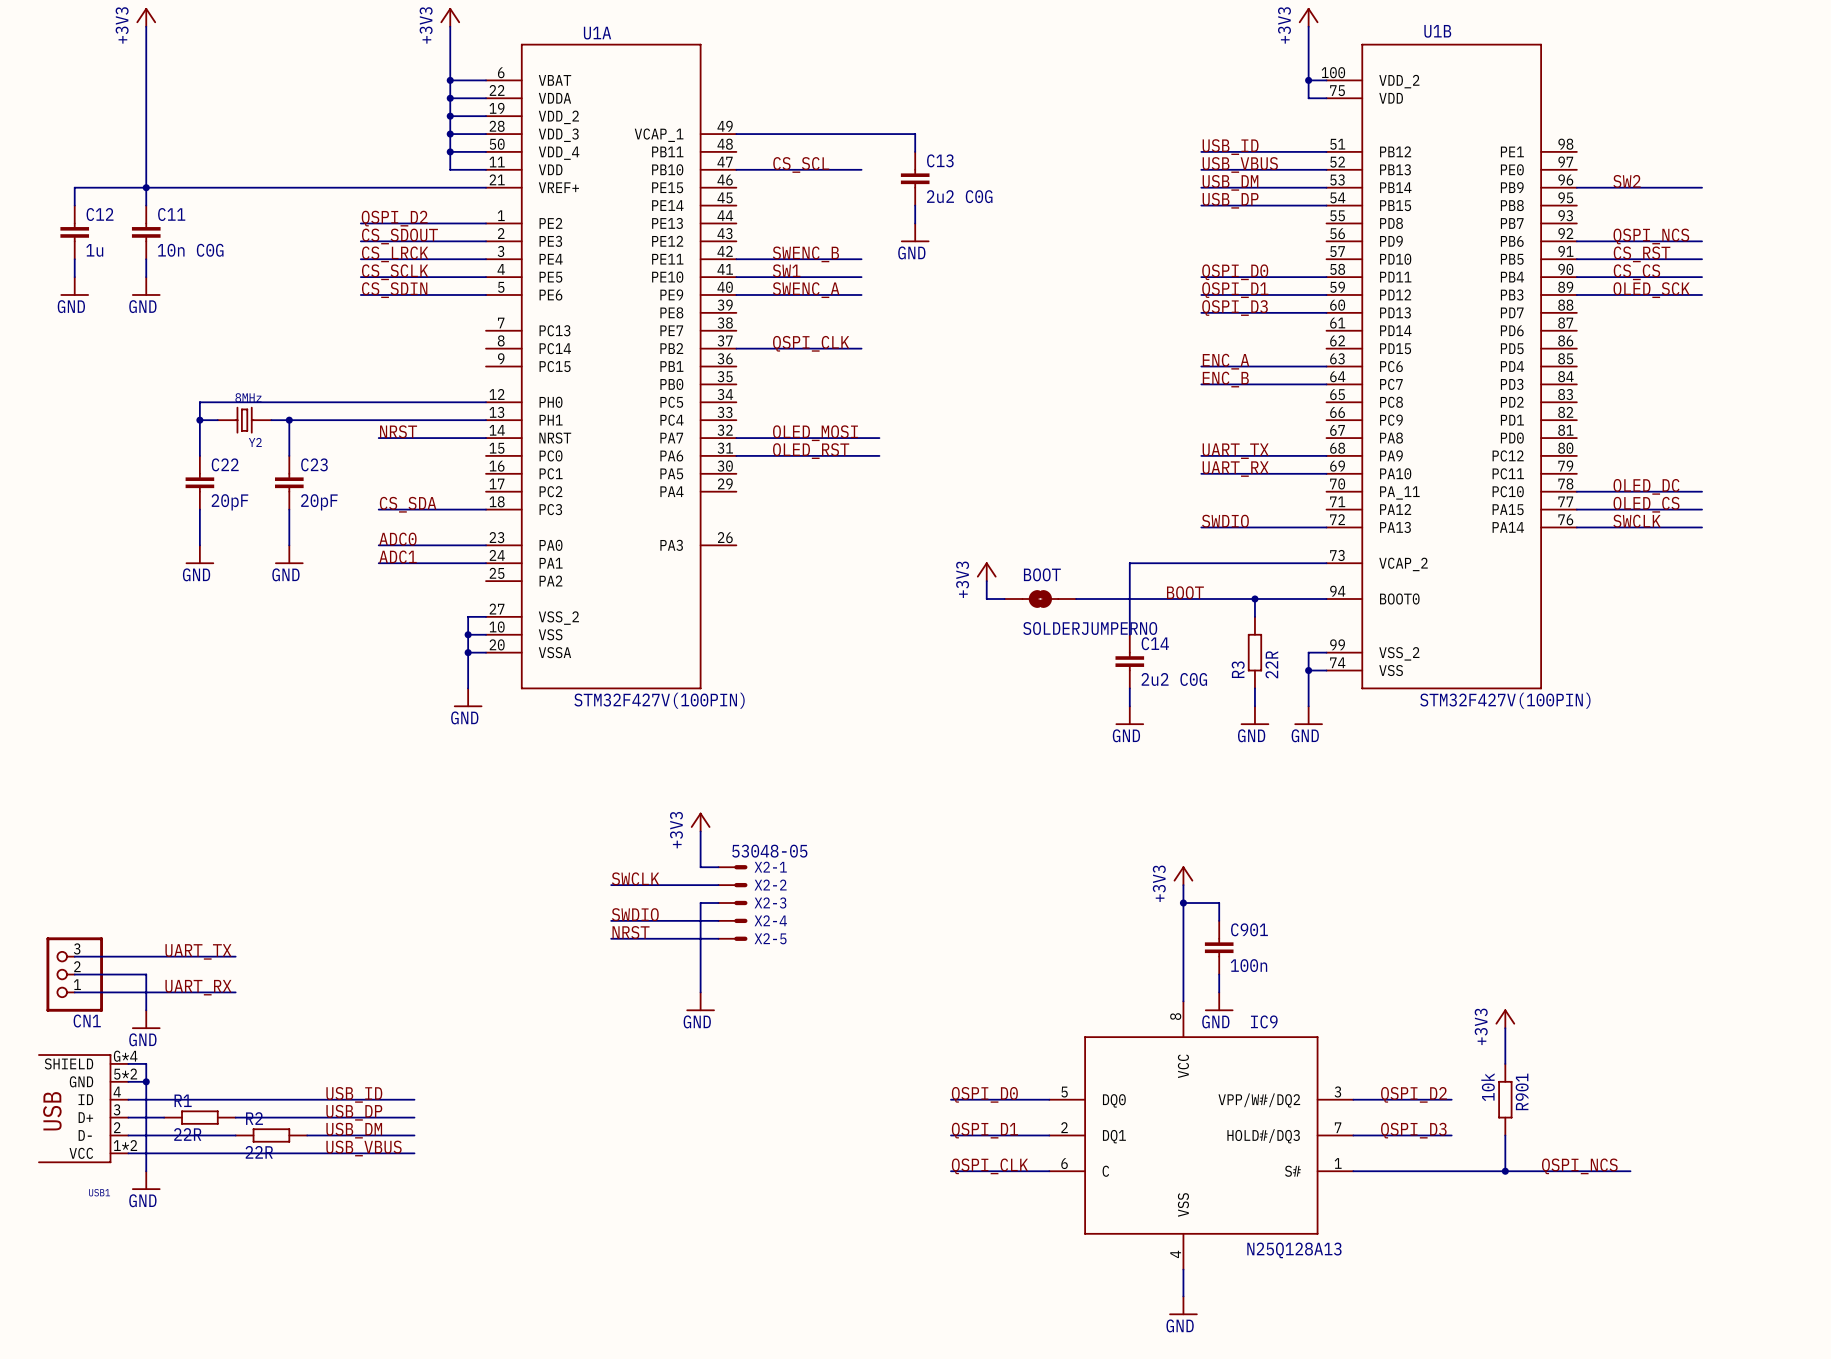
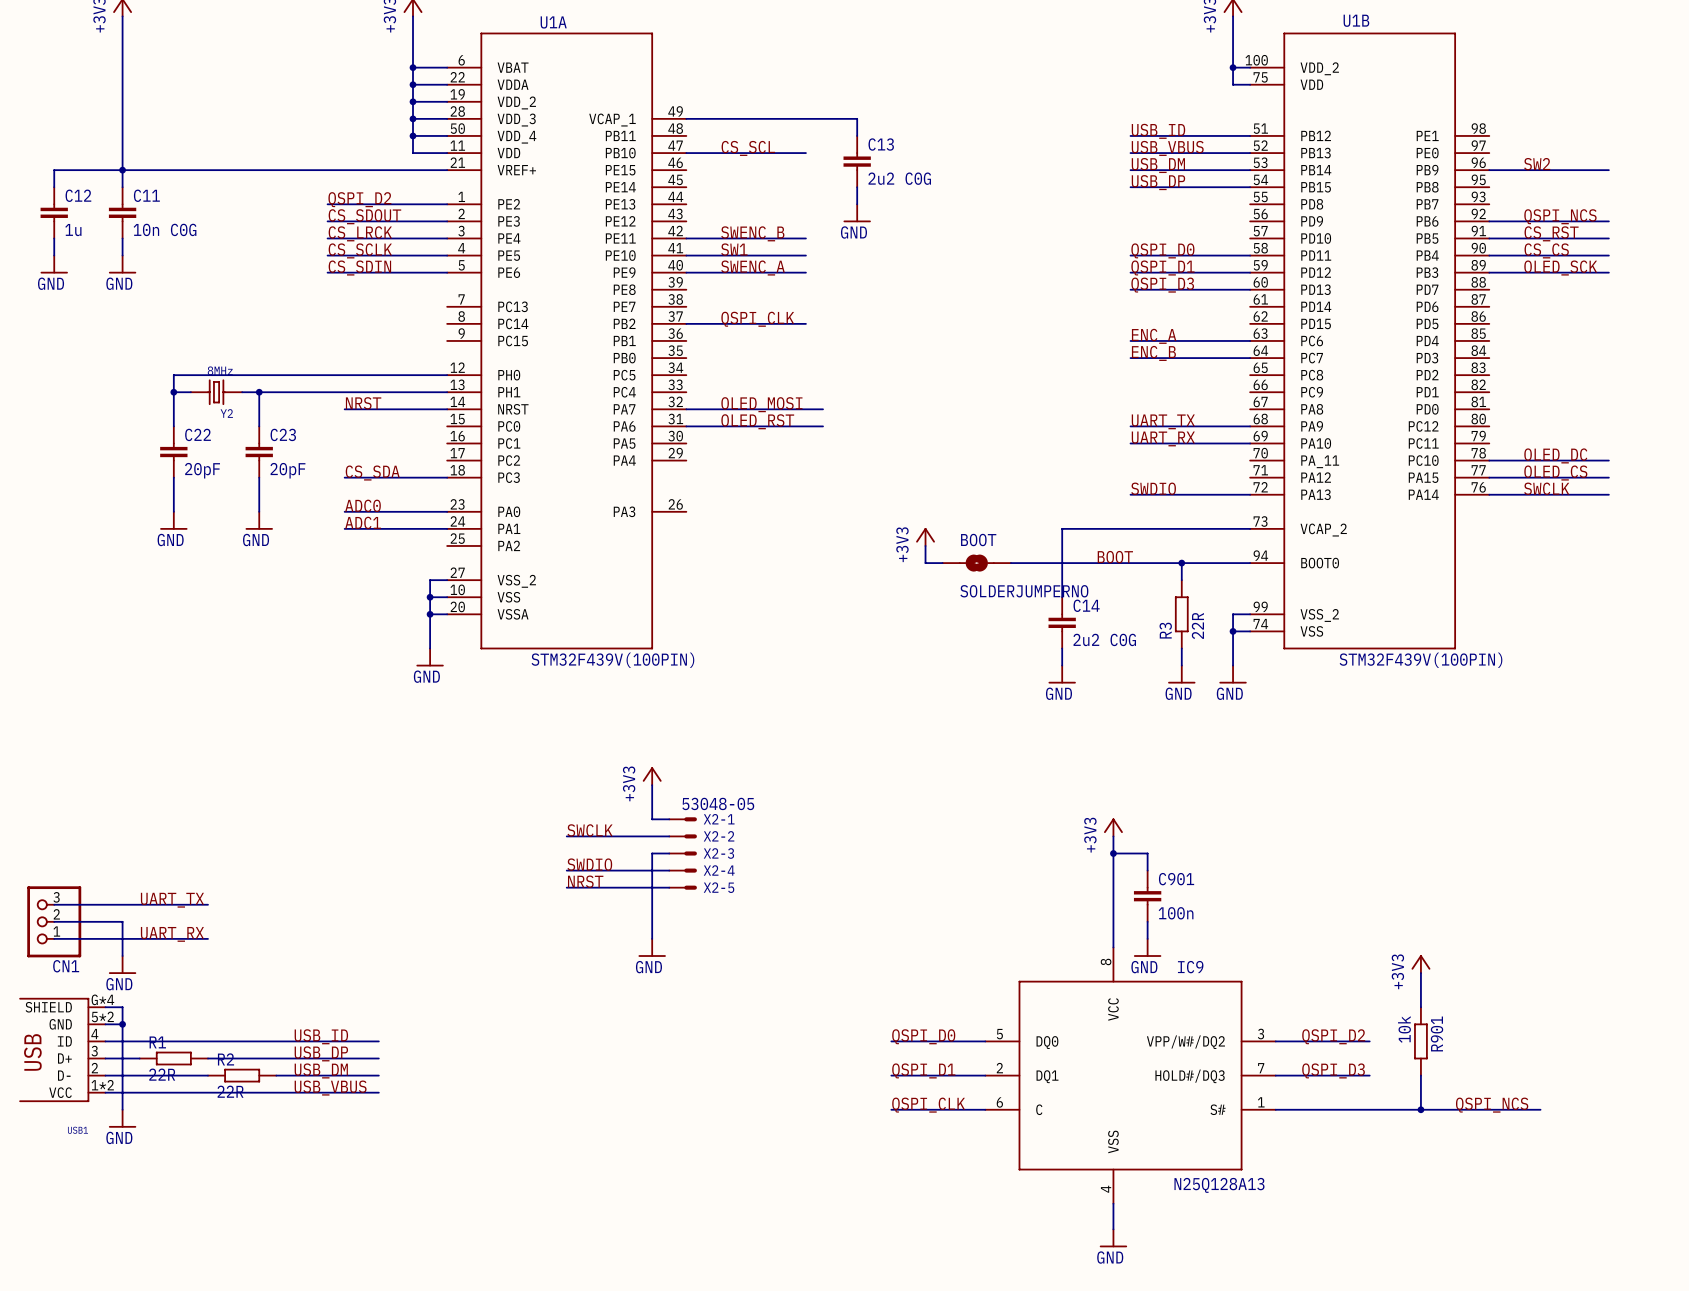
U1A value: STM32F427V(100PIN) (659, 700) -> STM32F439V(100PIN) (612, 660)
U1B value: STM32F427V(100PIN) (1505, 700) -> STM32F439V(100PIN) (1420, 660)

